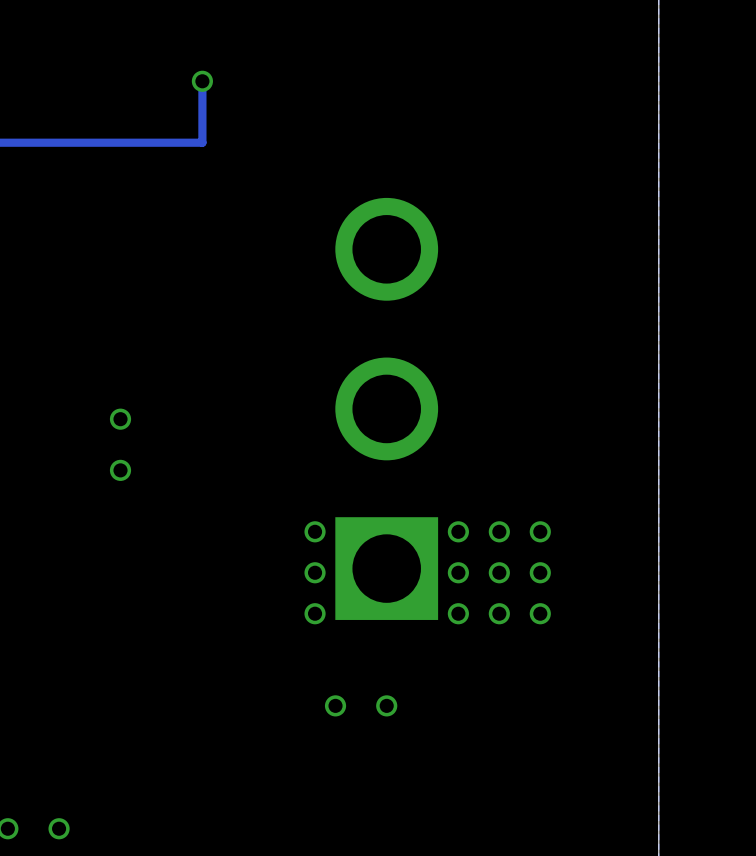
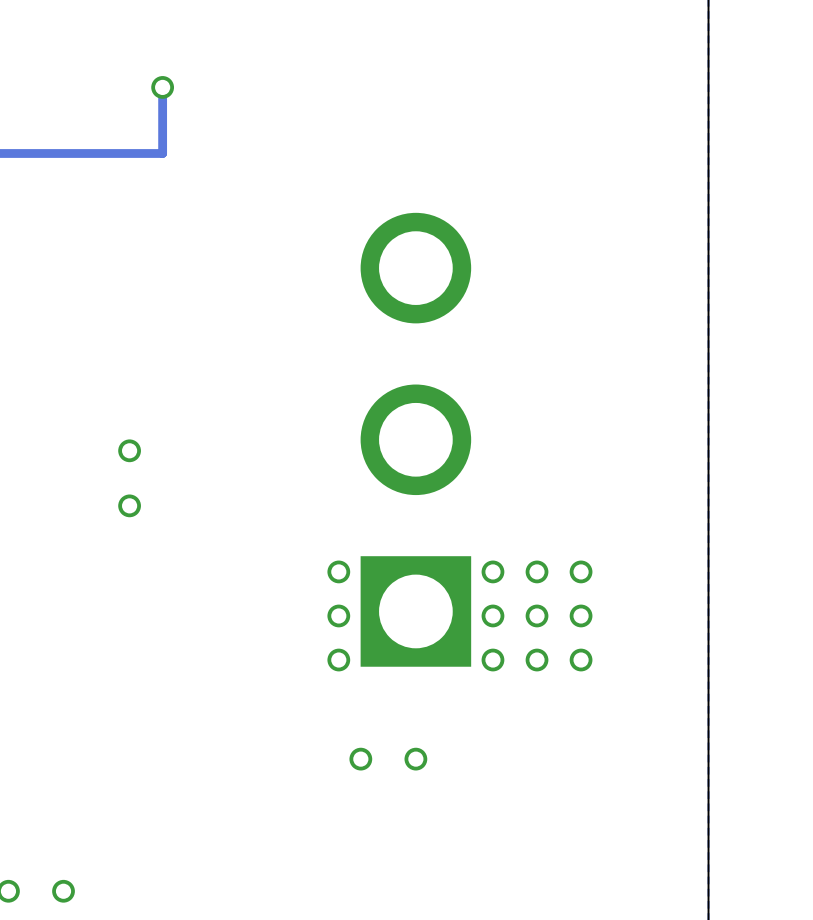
track: (202, 81) (202, 142) (151, 142) -> (162, 87) (162, 153)
via position: (202, 81) -> (162, 87)

